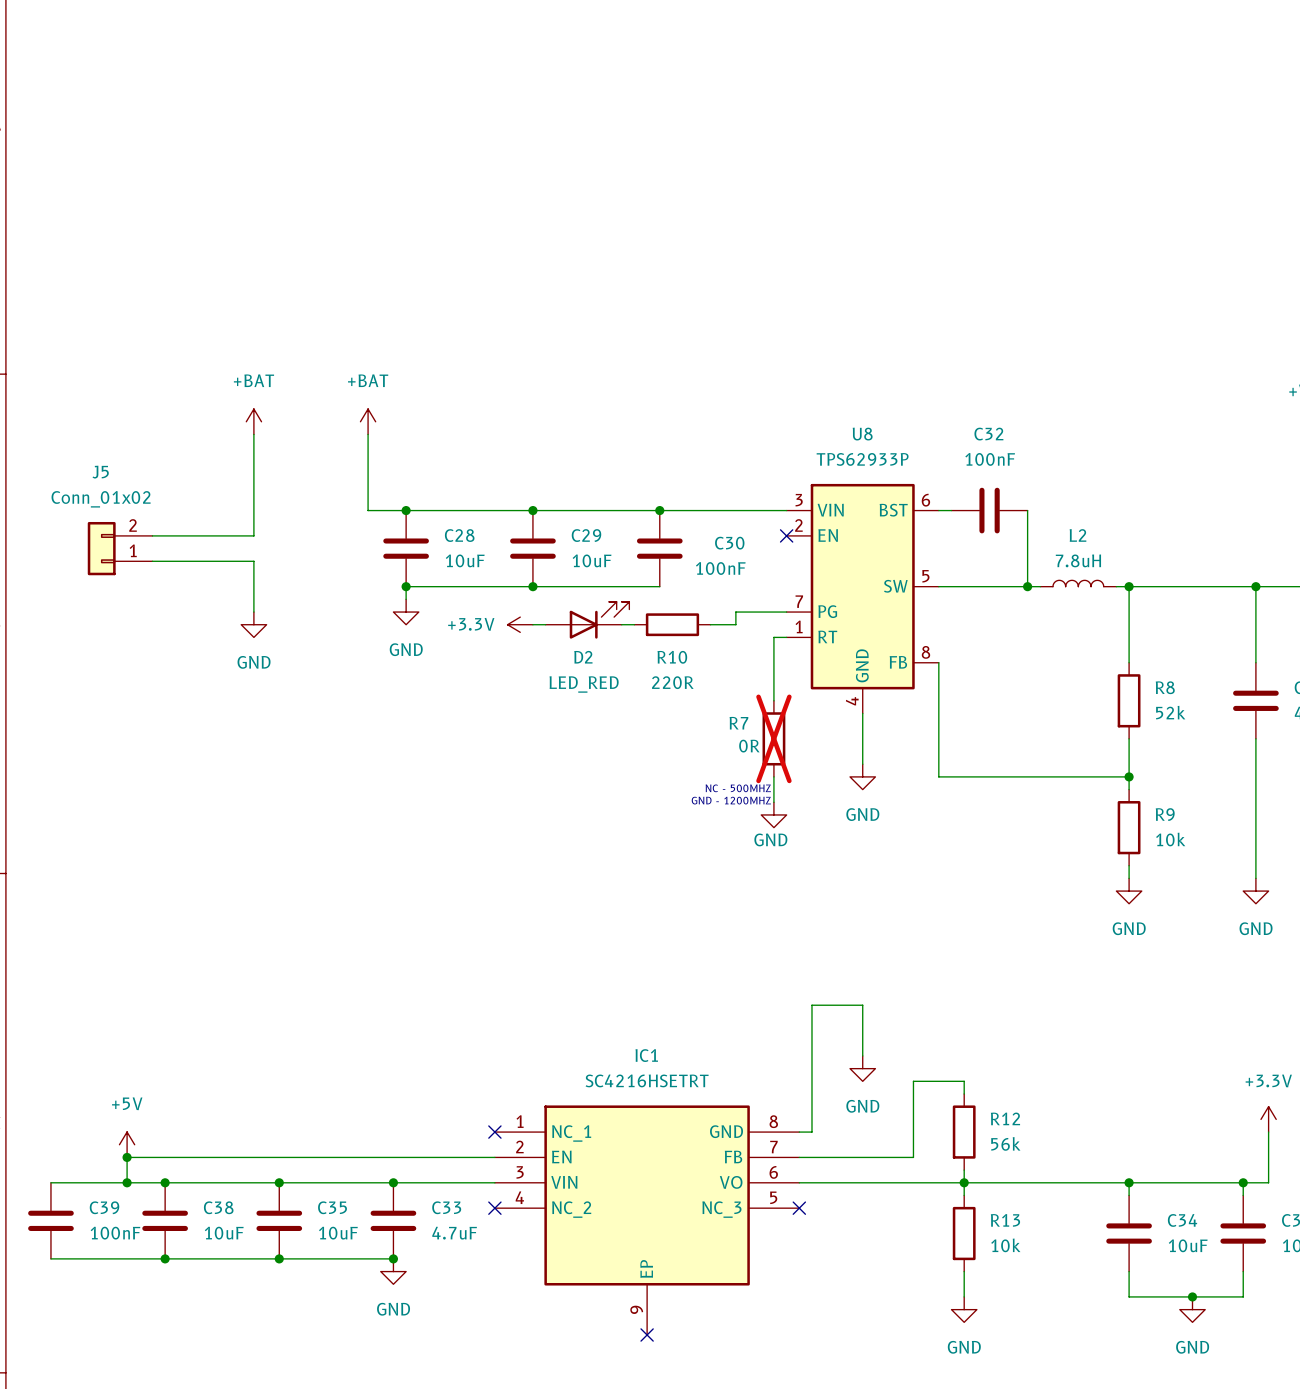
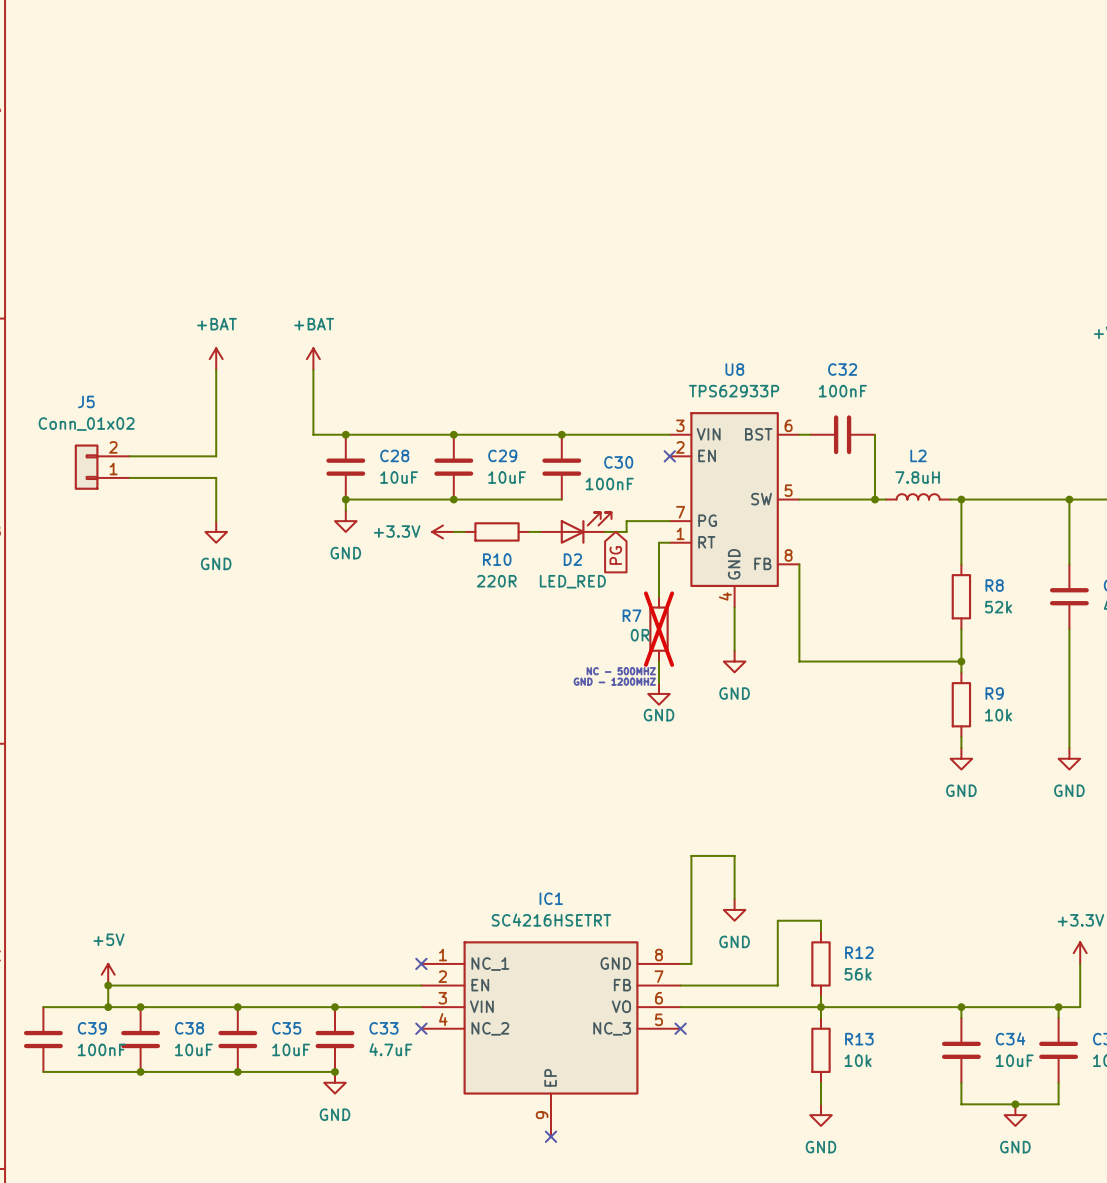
D2 position: (587, 620) -> (575, 528)
R10 position: (672, 624) -> (497, 531)
global label: none -> PG (615, 555)

